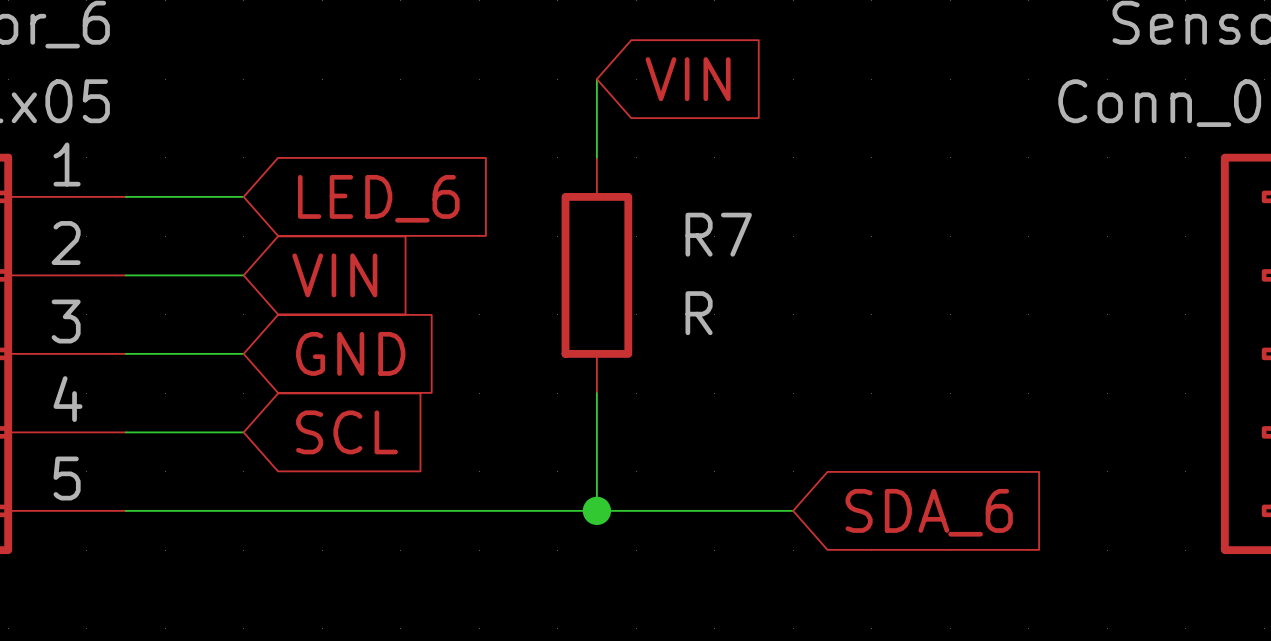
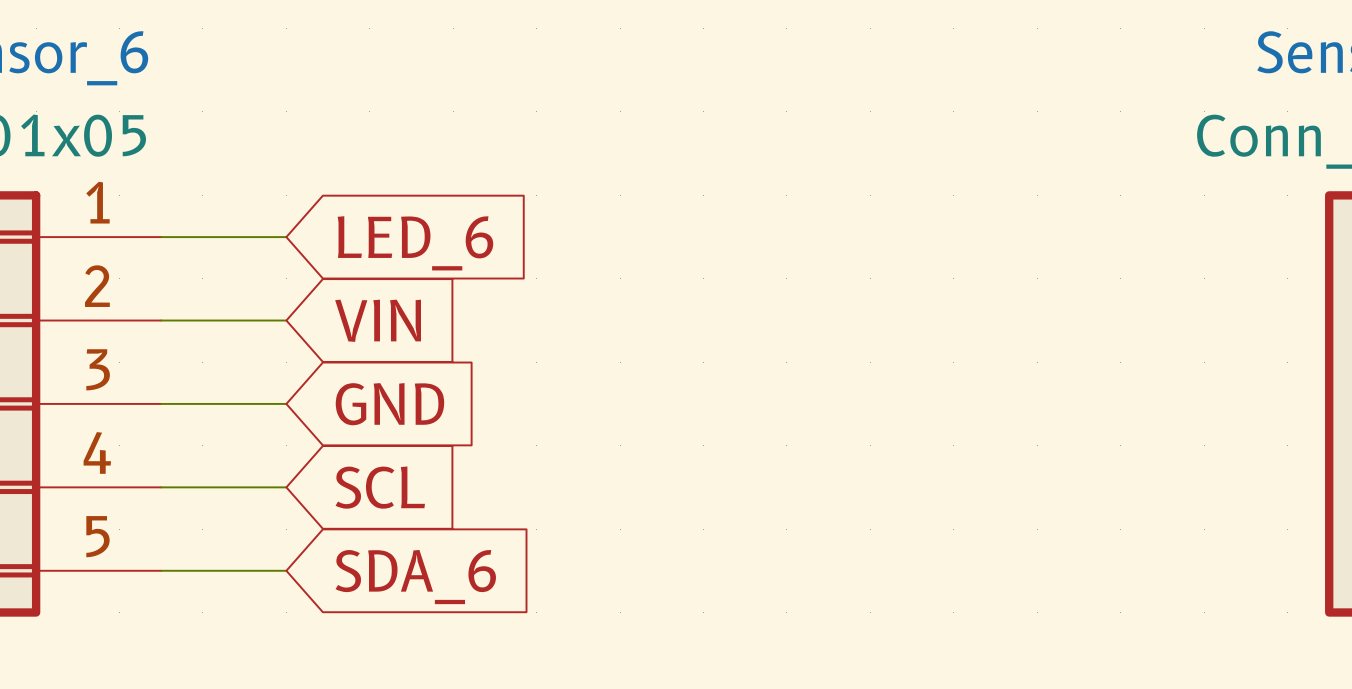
wire: (596, 79) (596, 157) -> none
global label: VIN (688, 79) -> none
R7: R (596, 275) -> none
wire: (596, 393) (596, 510) -> none
wire: (243, 510) (793, 510) -> none
junction: (596, 510) -> none
global label position: SDA_6 (929, 512) -> SDA_6 (415, 577)

